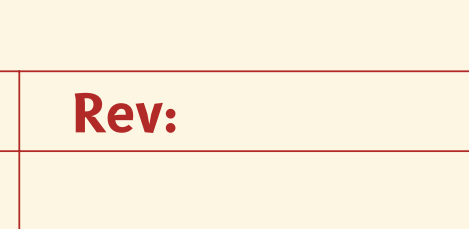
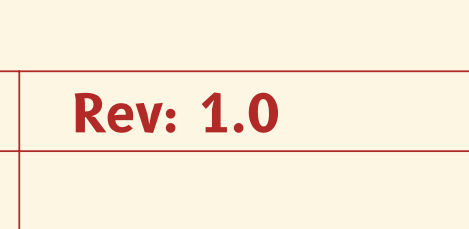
title block: Rev: (125, 112) -> Rev: 1.0 (176, 112)

